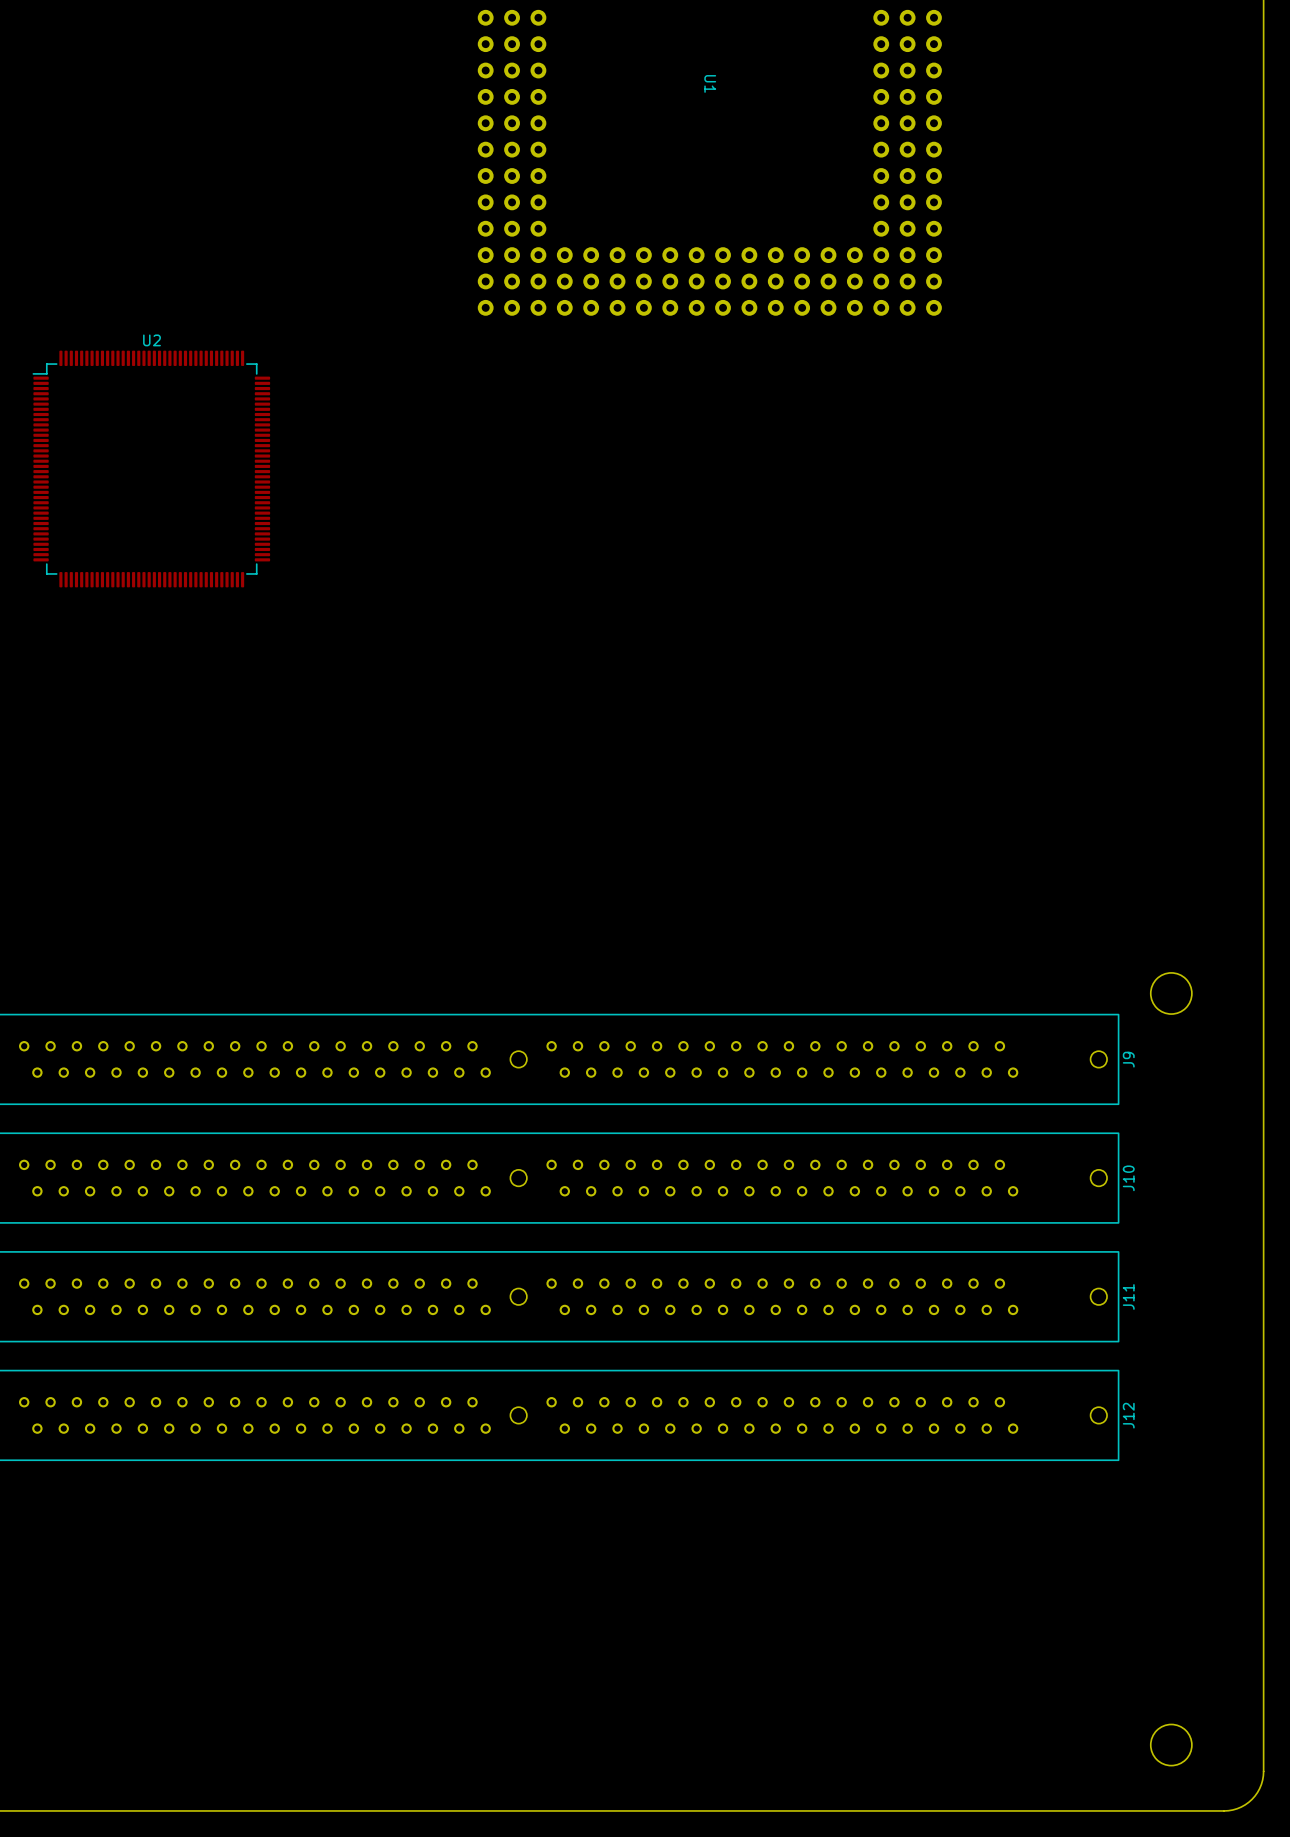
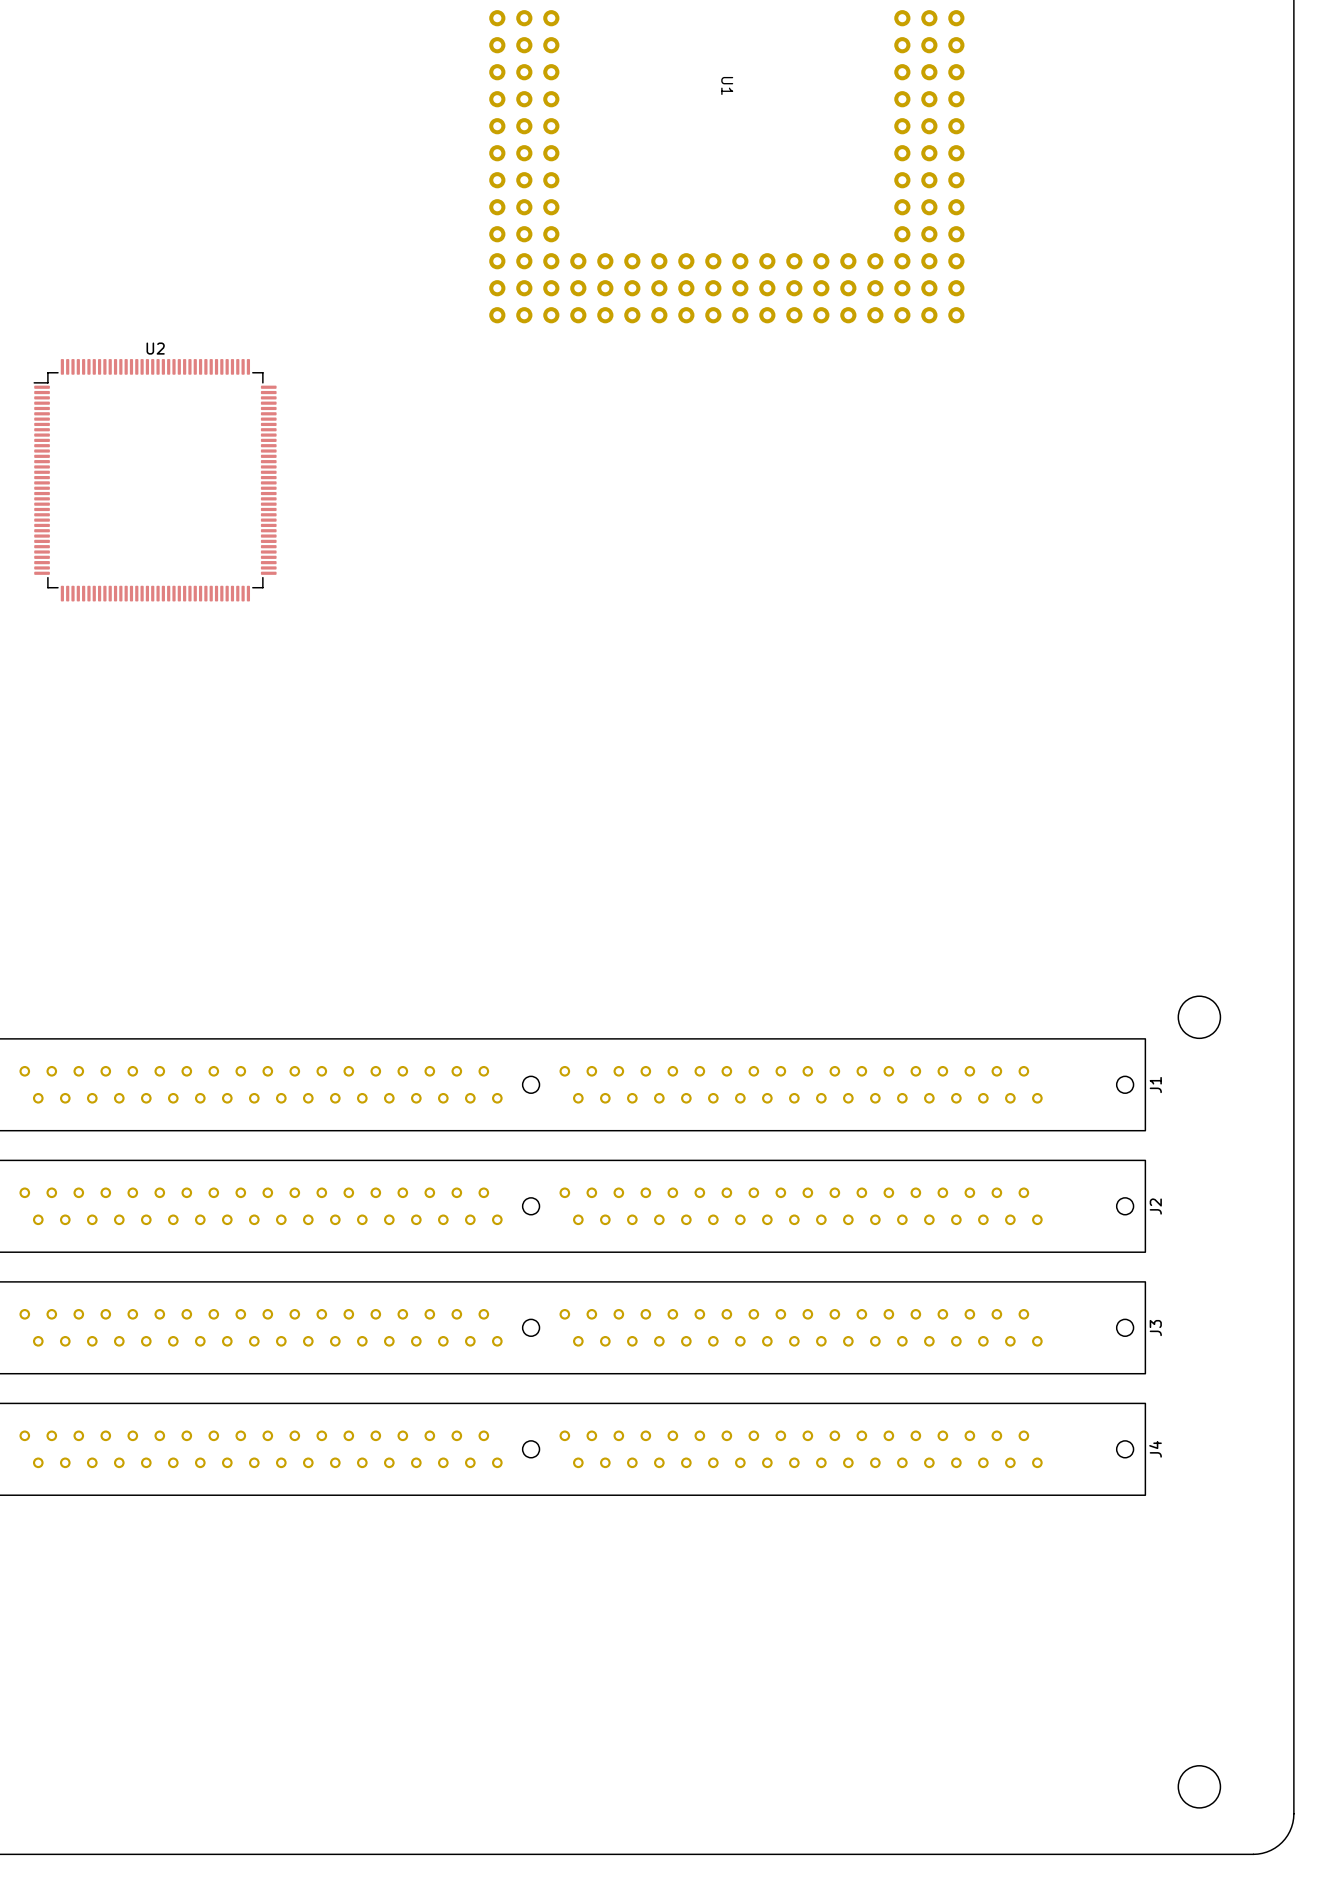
J9 name: J9 (1128, 1059) -> J1 (1155, 1085)
J10 name: J10 (1128, 1178) -> J2 (1155, 1206)
J11 name: J11 (1128, 1296) -> J3 (1155, 1328)
J12 name: J12 (1128, 1415) -> J4 (1155, 1449)

